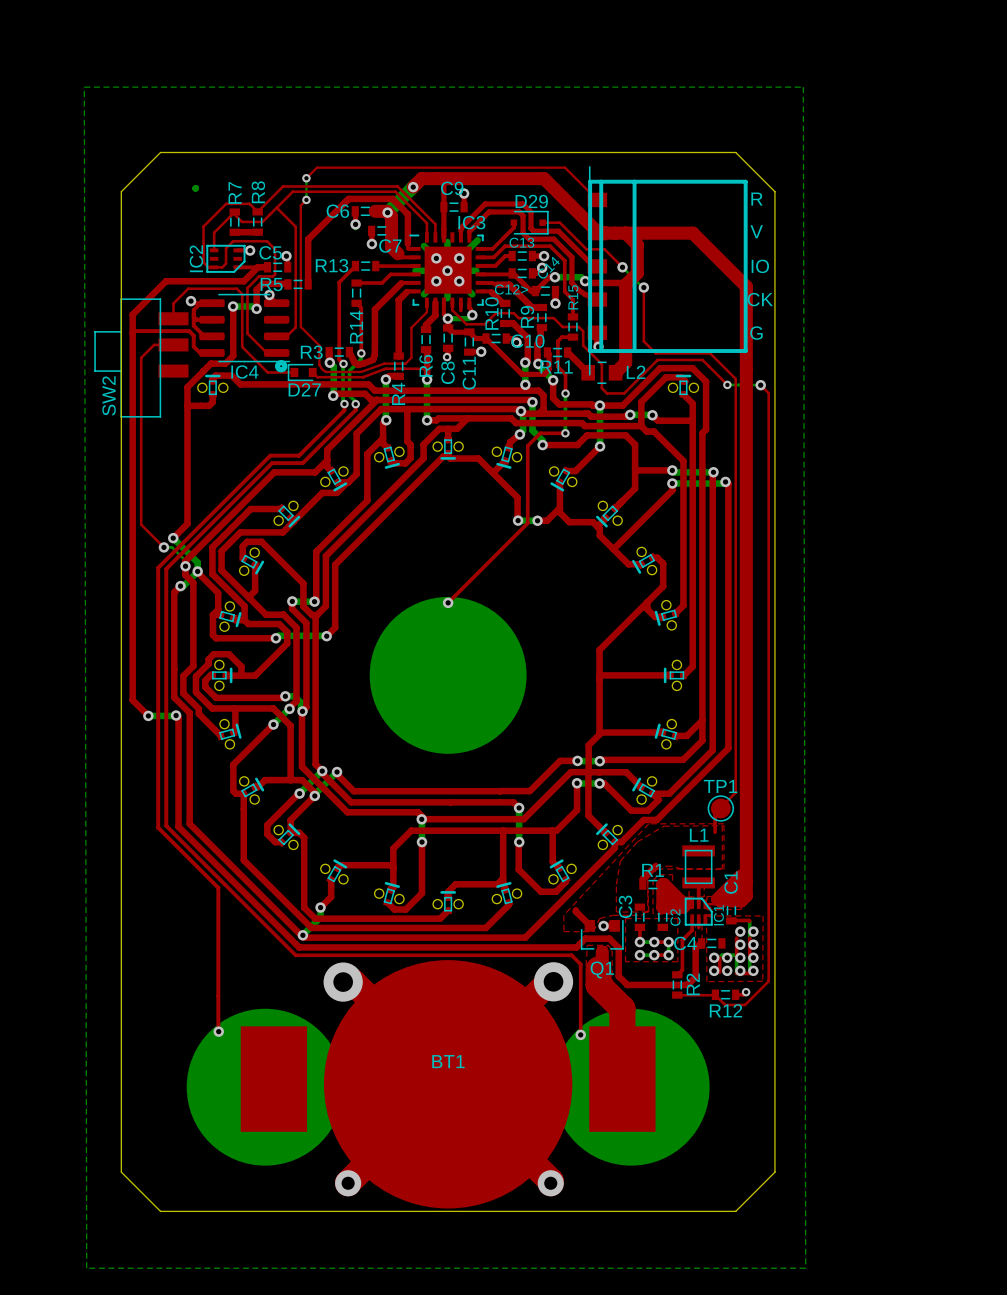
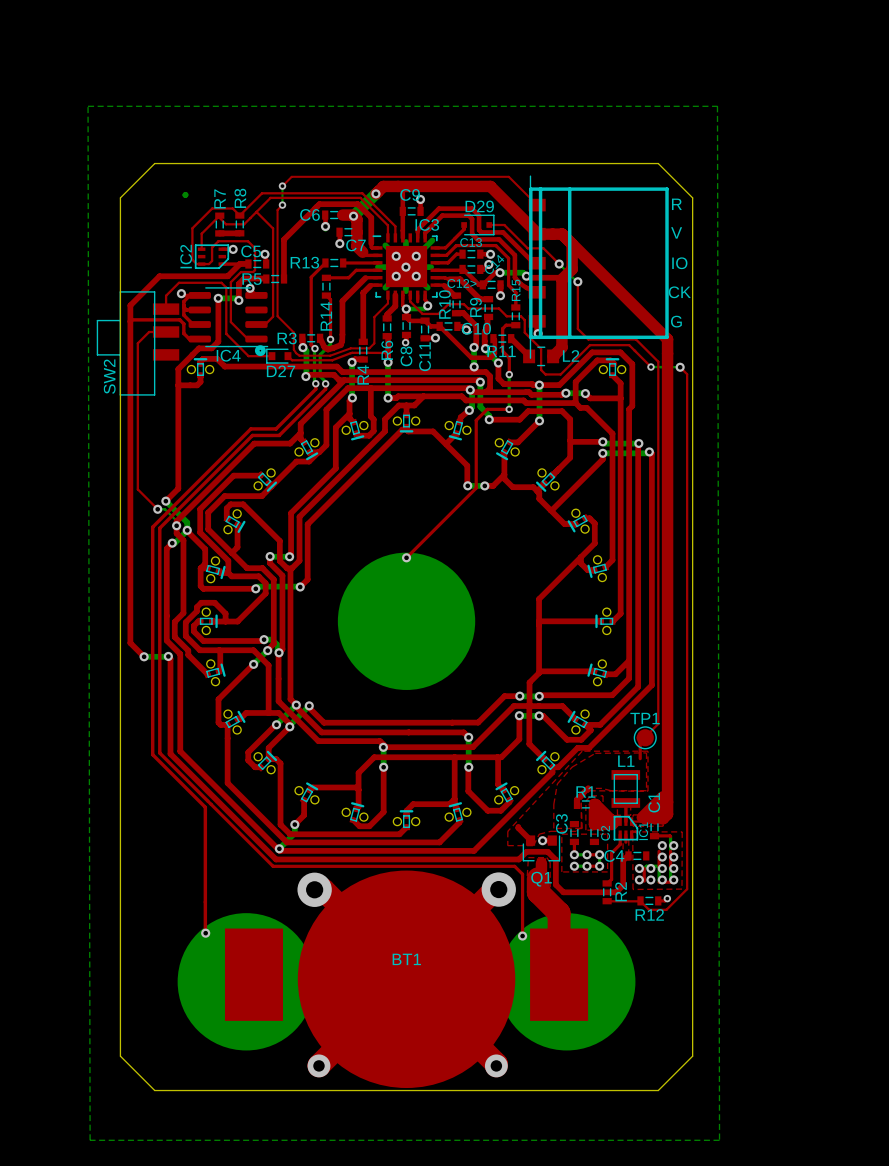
top track: (626, 233) (692, 233) (746, 286) (746, 353) -> (562, 234) (667, 339)

